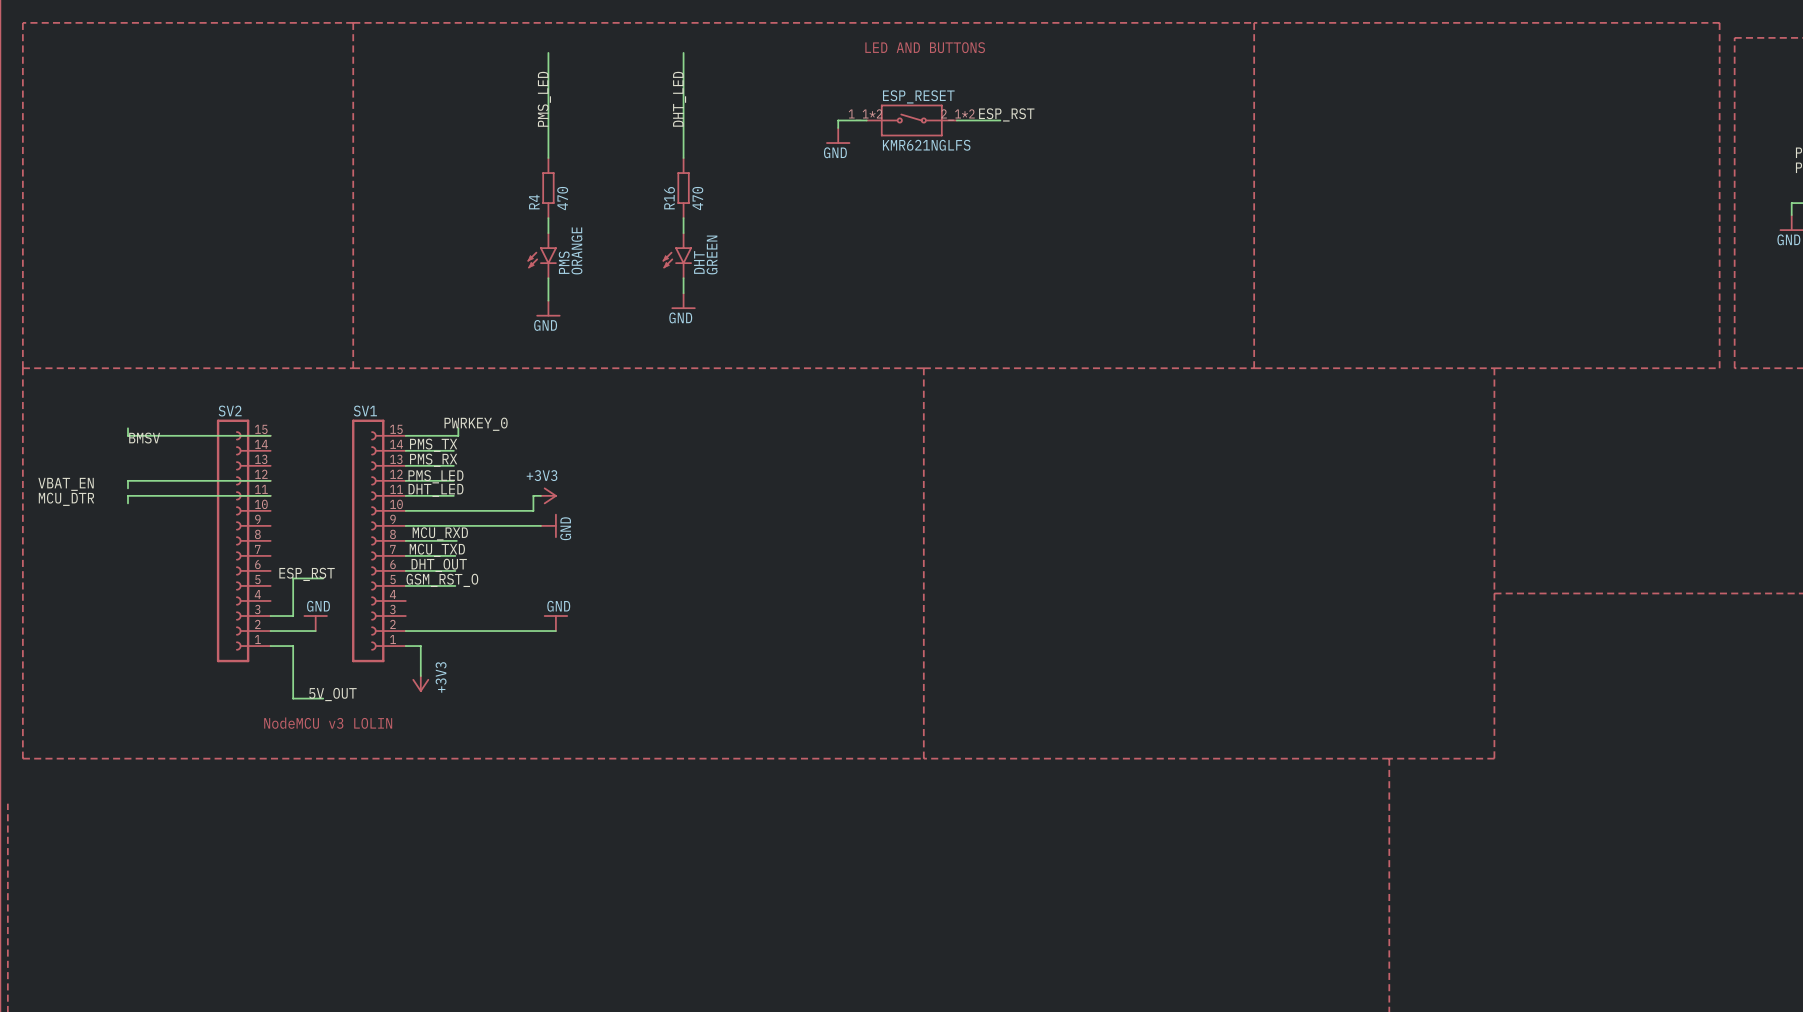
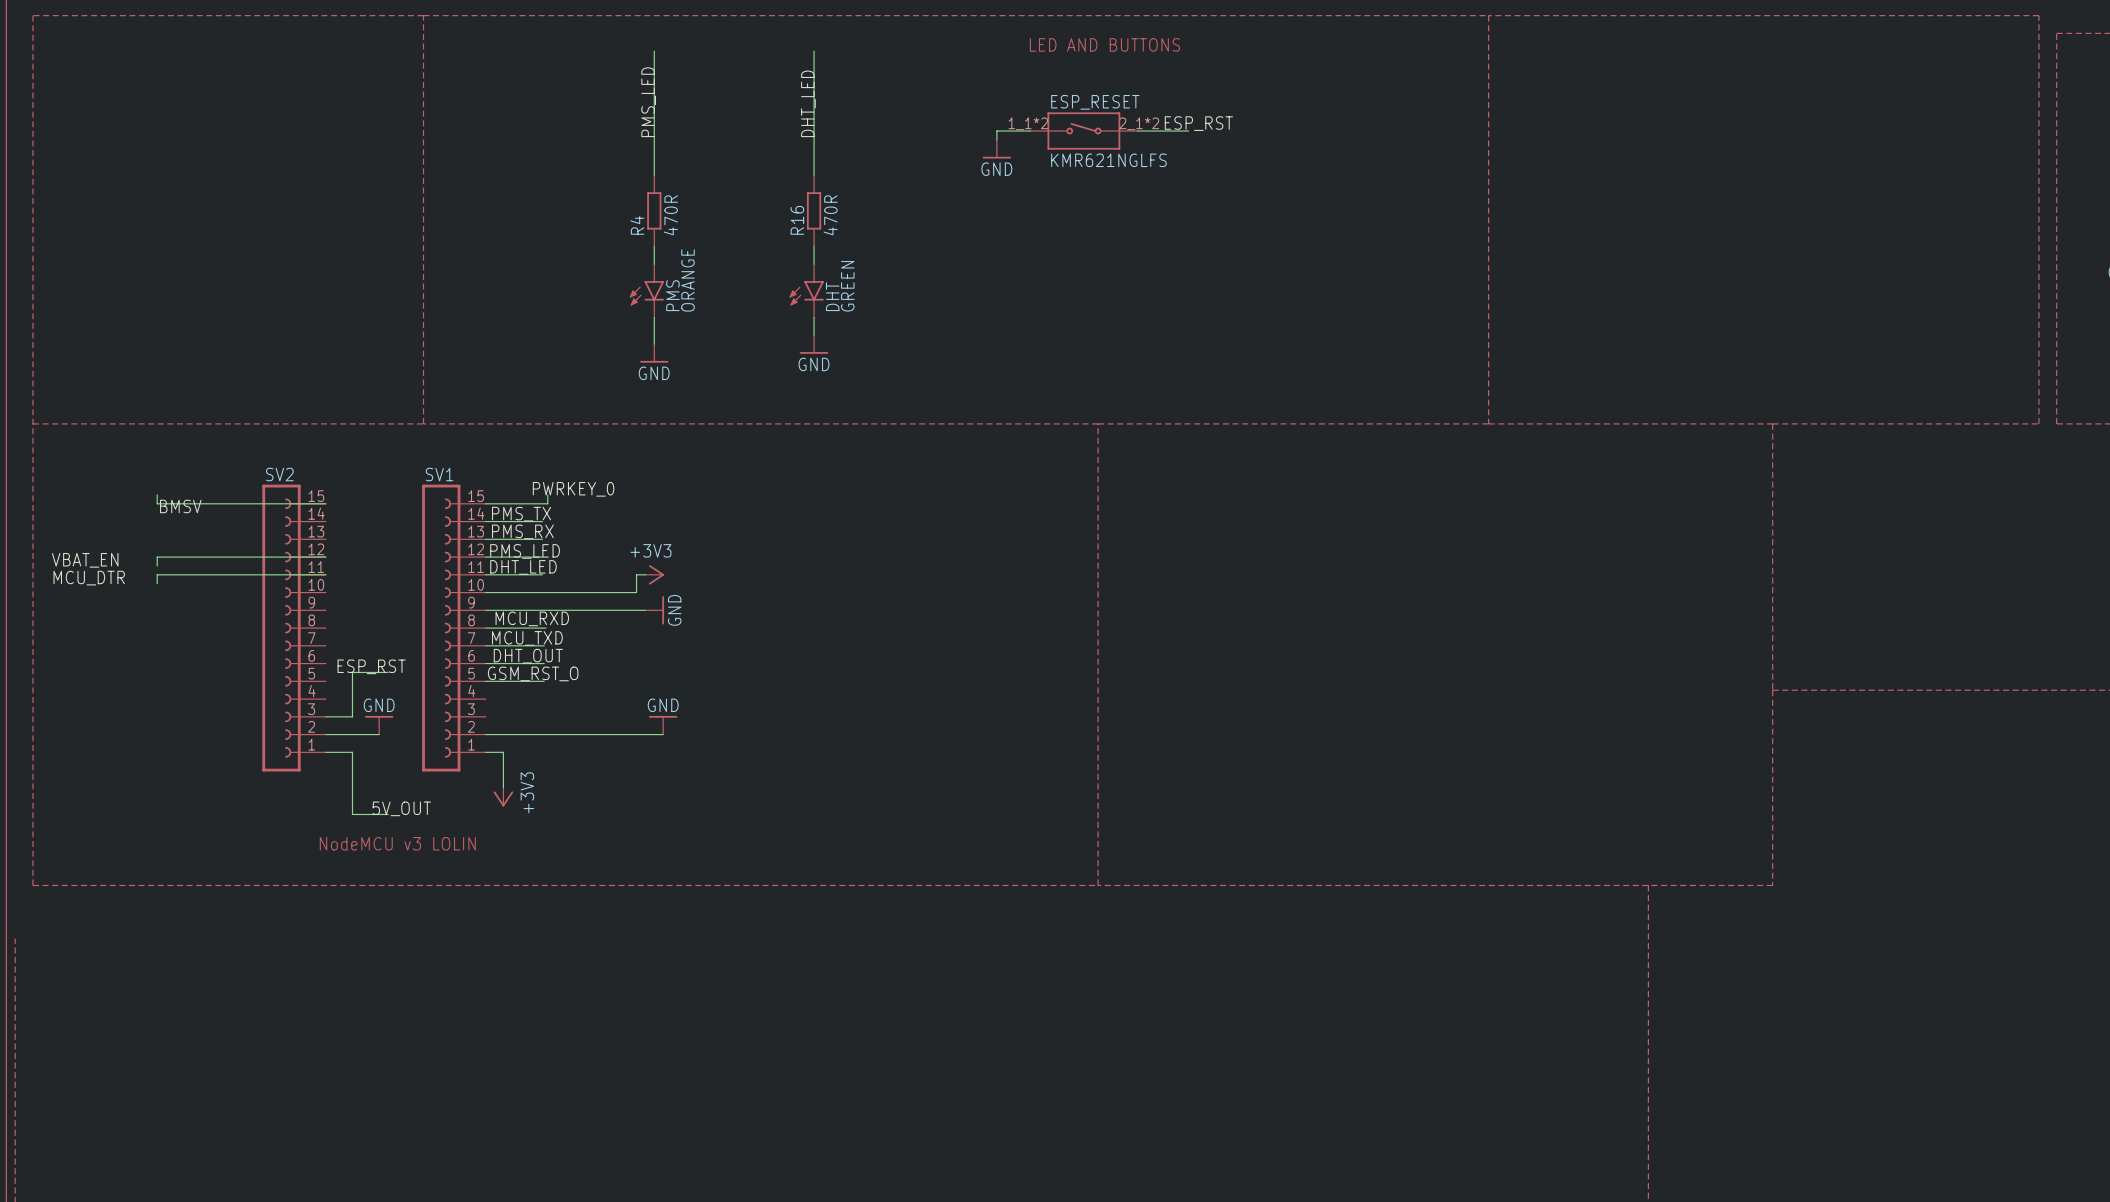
R4 value: 470 (562, 198) -> 470R (670, 215)
R16 value: 470 (697, 198) -> 470R (830, 215)

